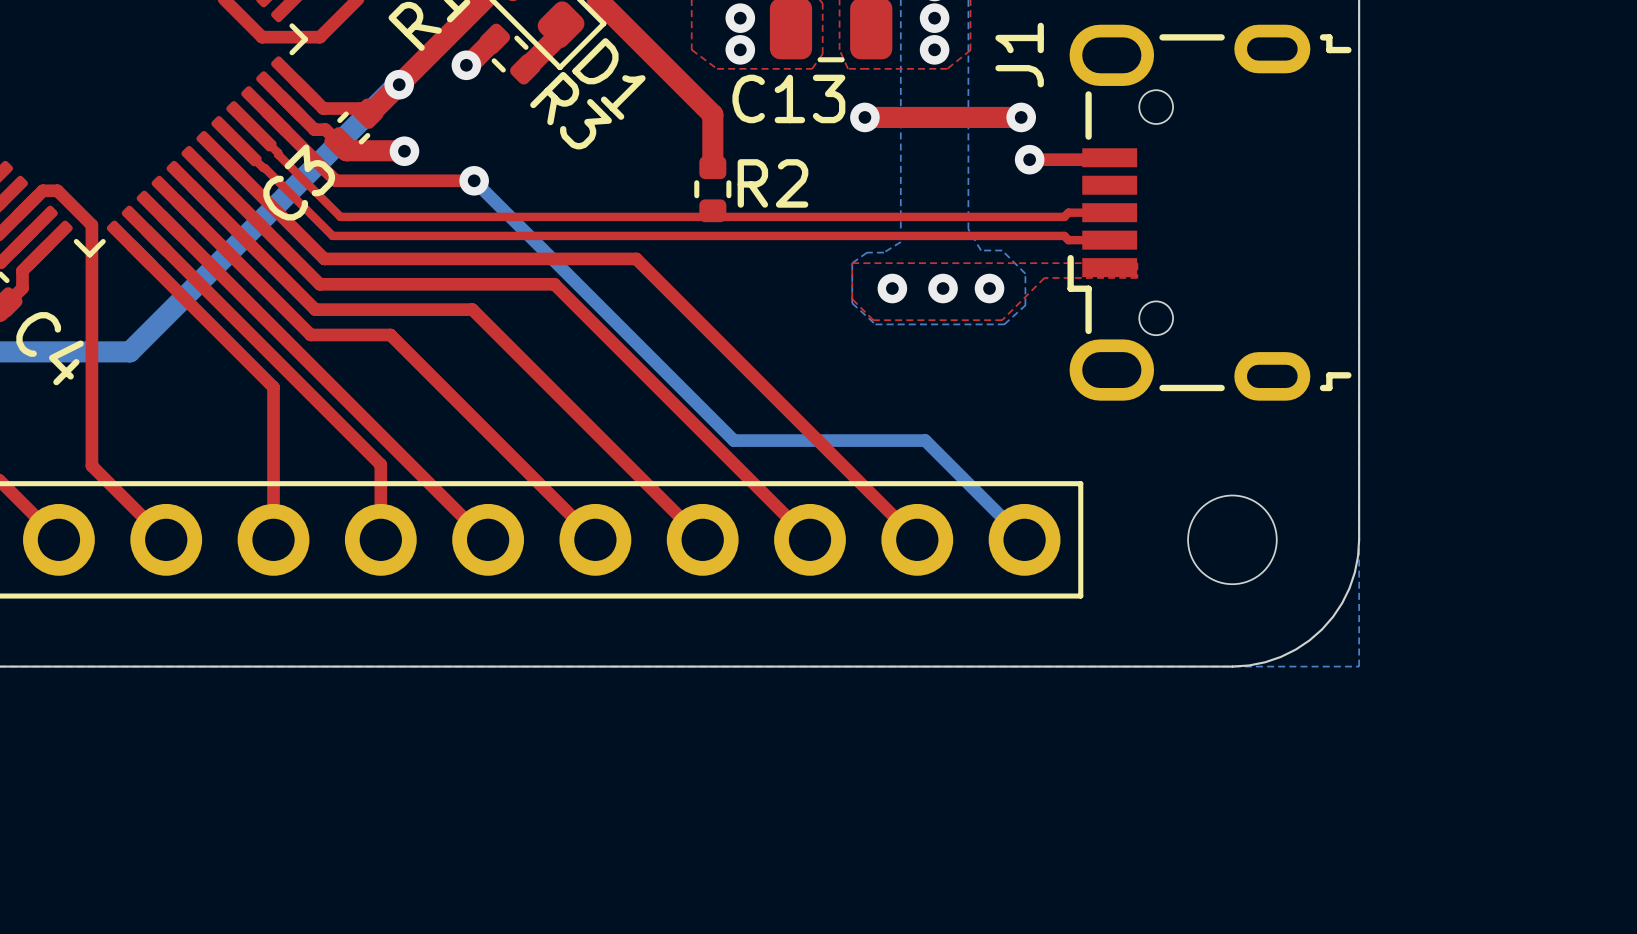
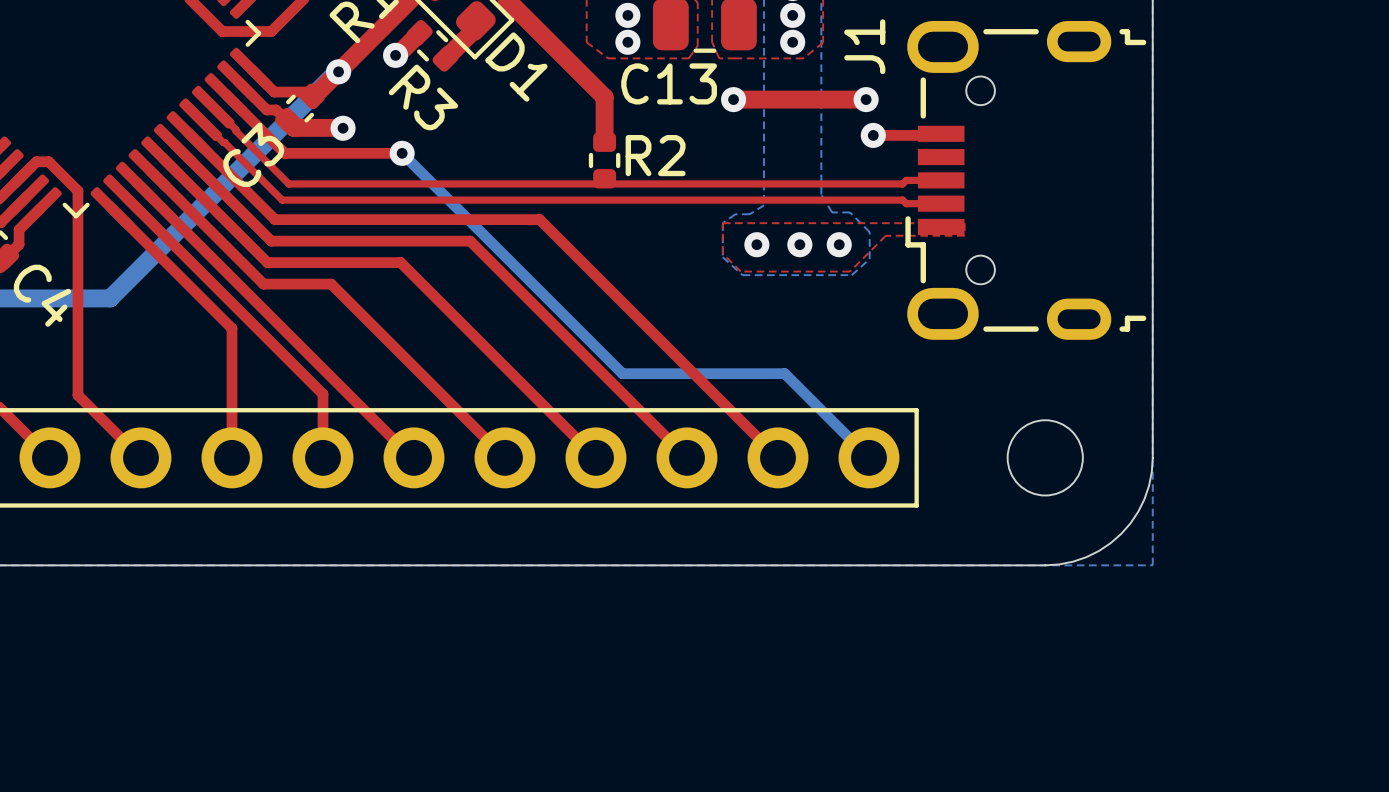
R3 name position: R3 (571, 110) -> R3 (423, 97)

